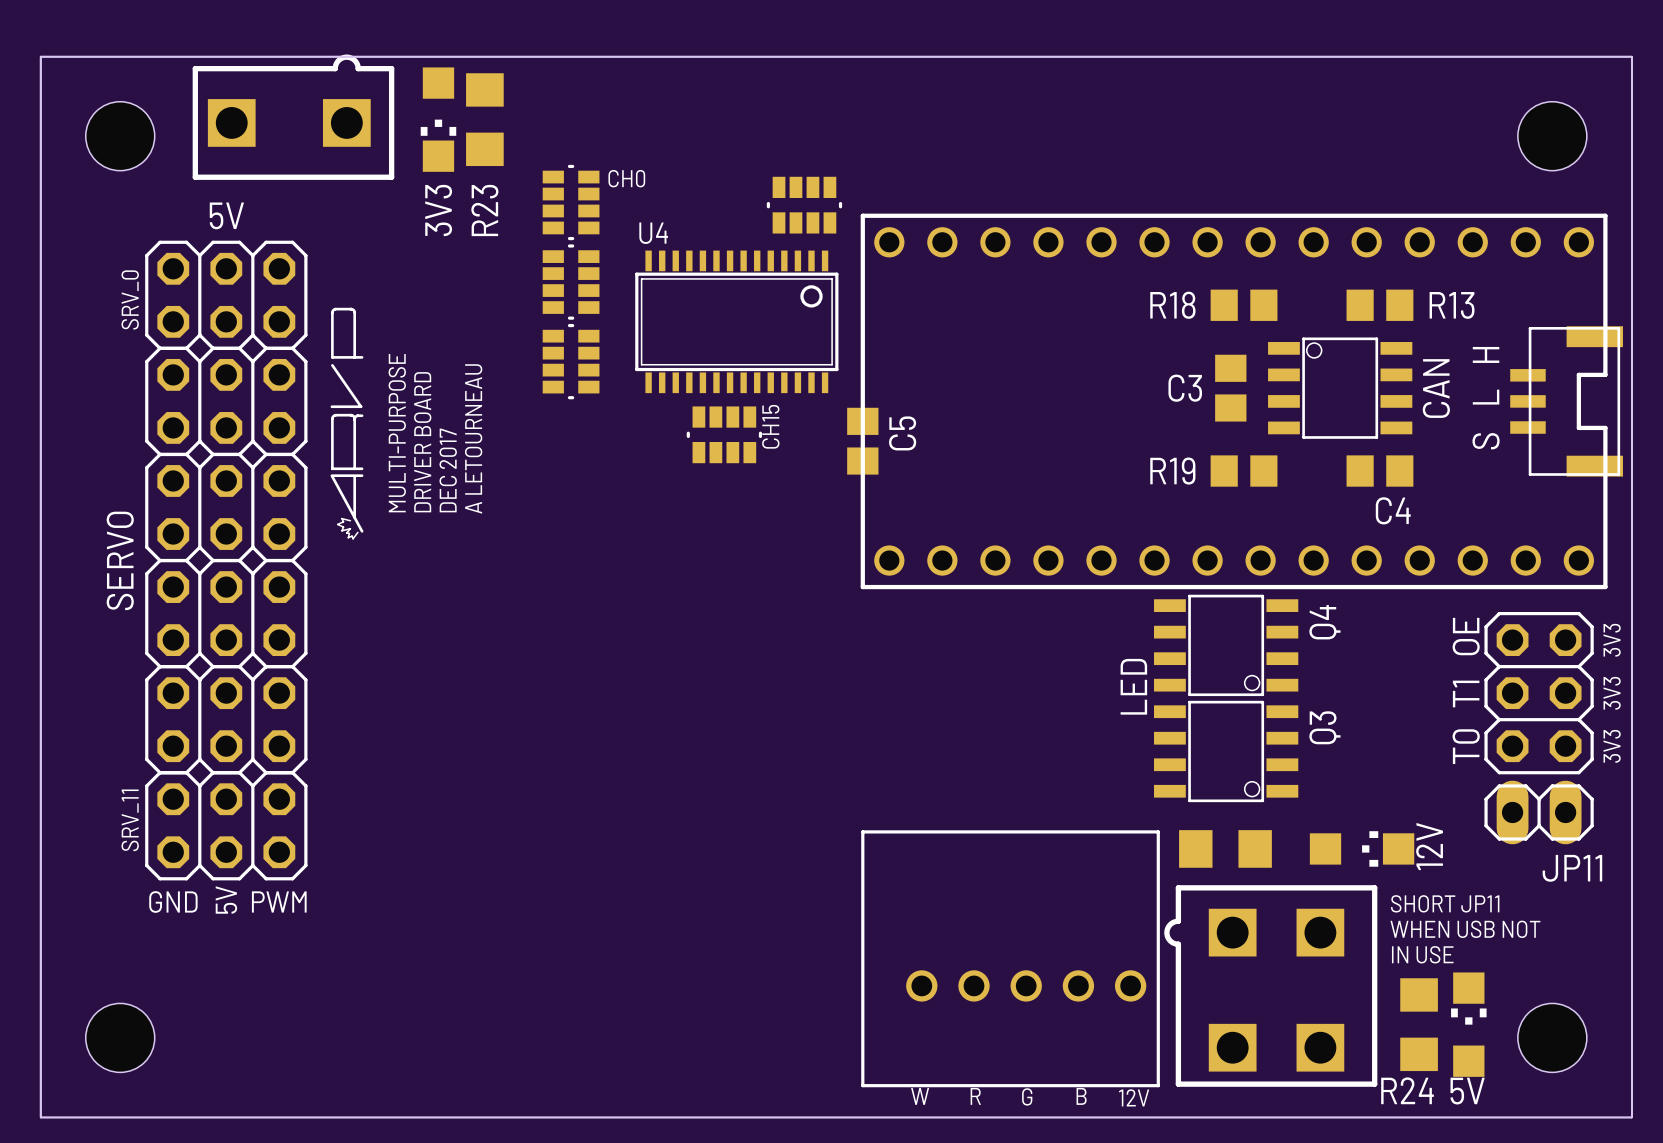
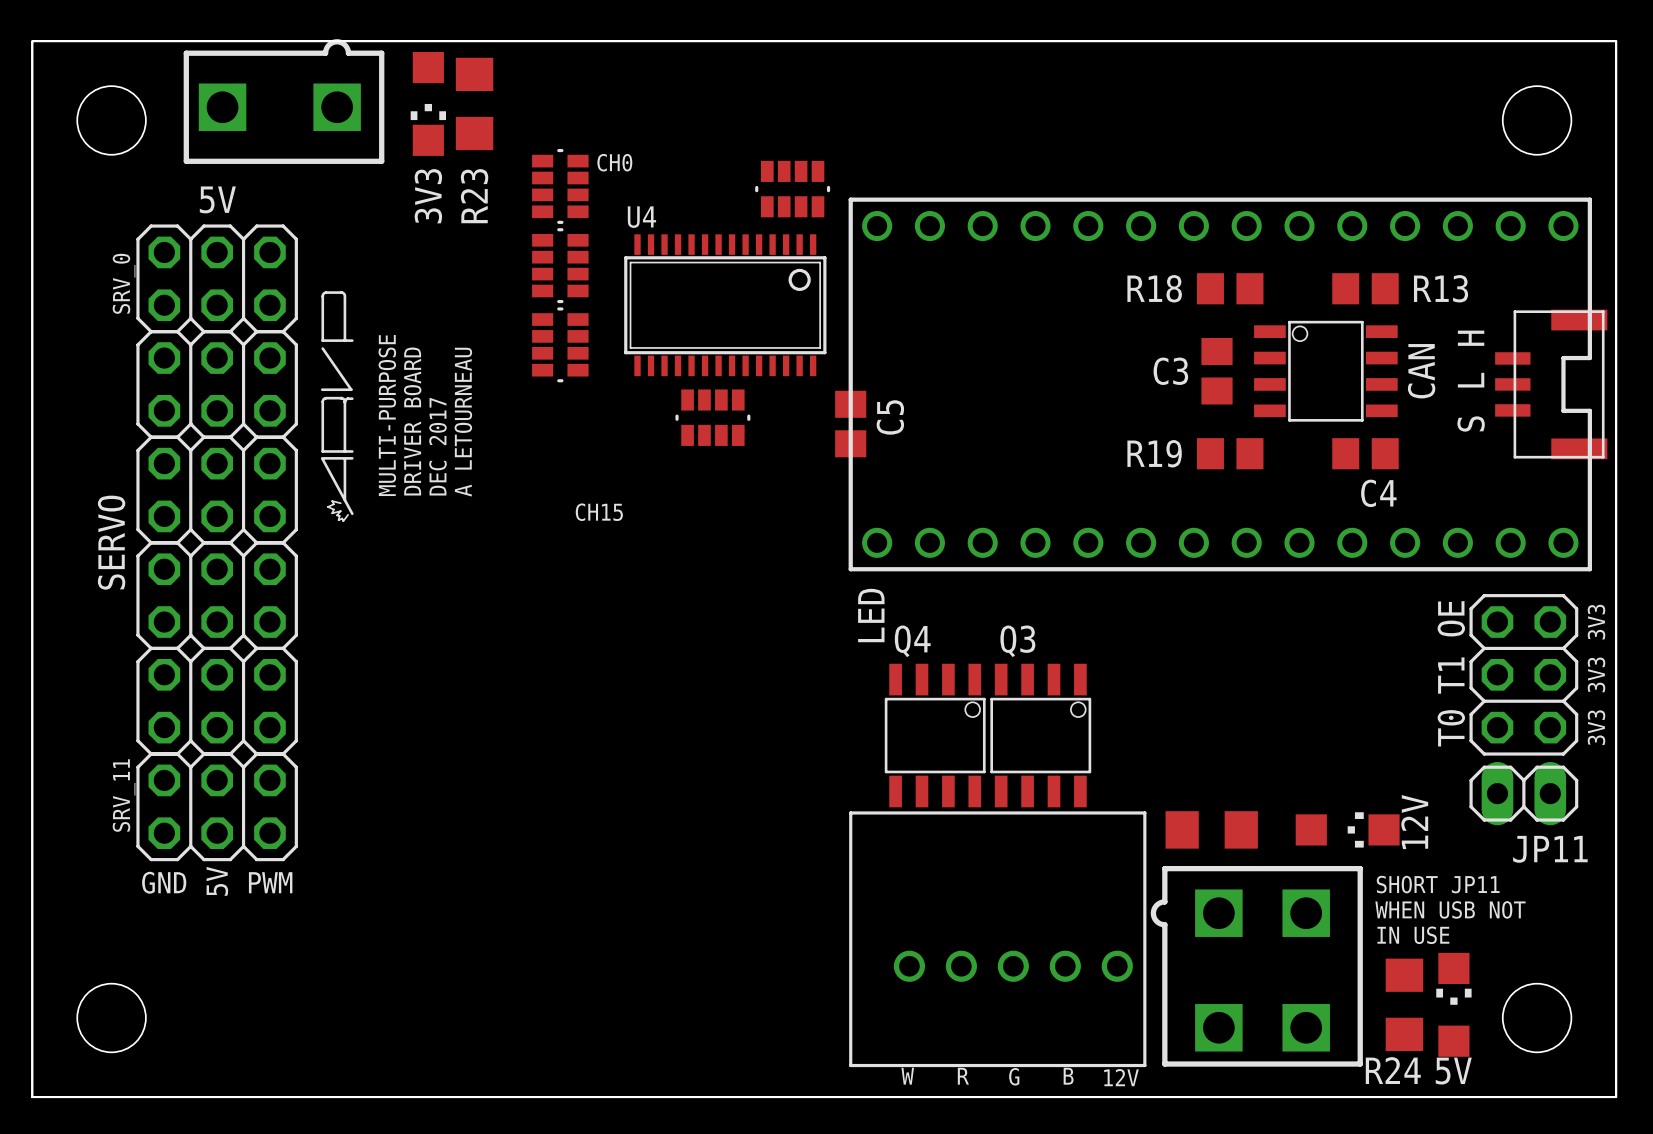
text rotation: 0° (770, 426) -> 90° clockwise (599, 512)
text position: CH15 (770, 426) -> CH15 (599, 512)
Q4 rotation: 0° (1226, 645) -> 90° counterclockwise (935, 735)
Q4 position: (1226, 645) -> (935, 735)
text position: LED (1133, 686) -> LED (871, 615)
Q3 rotation: 0° (1226, 751) -> 90° counterclockwise (1040, 735)
Q3 position: (1226, 751) -> (1040, 735)

